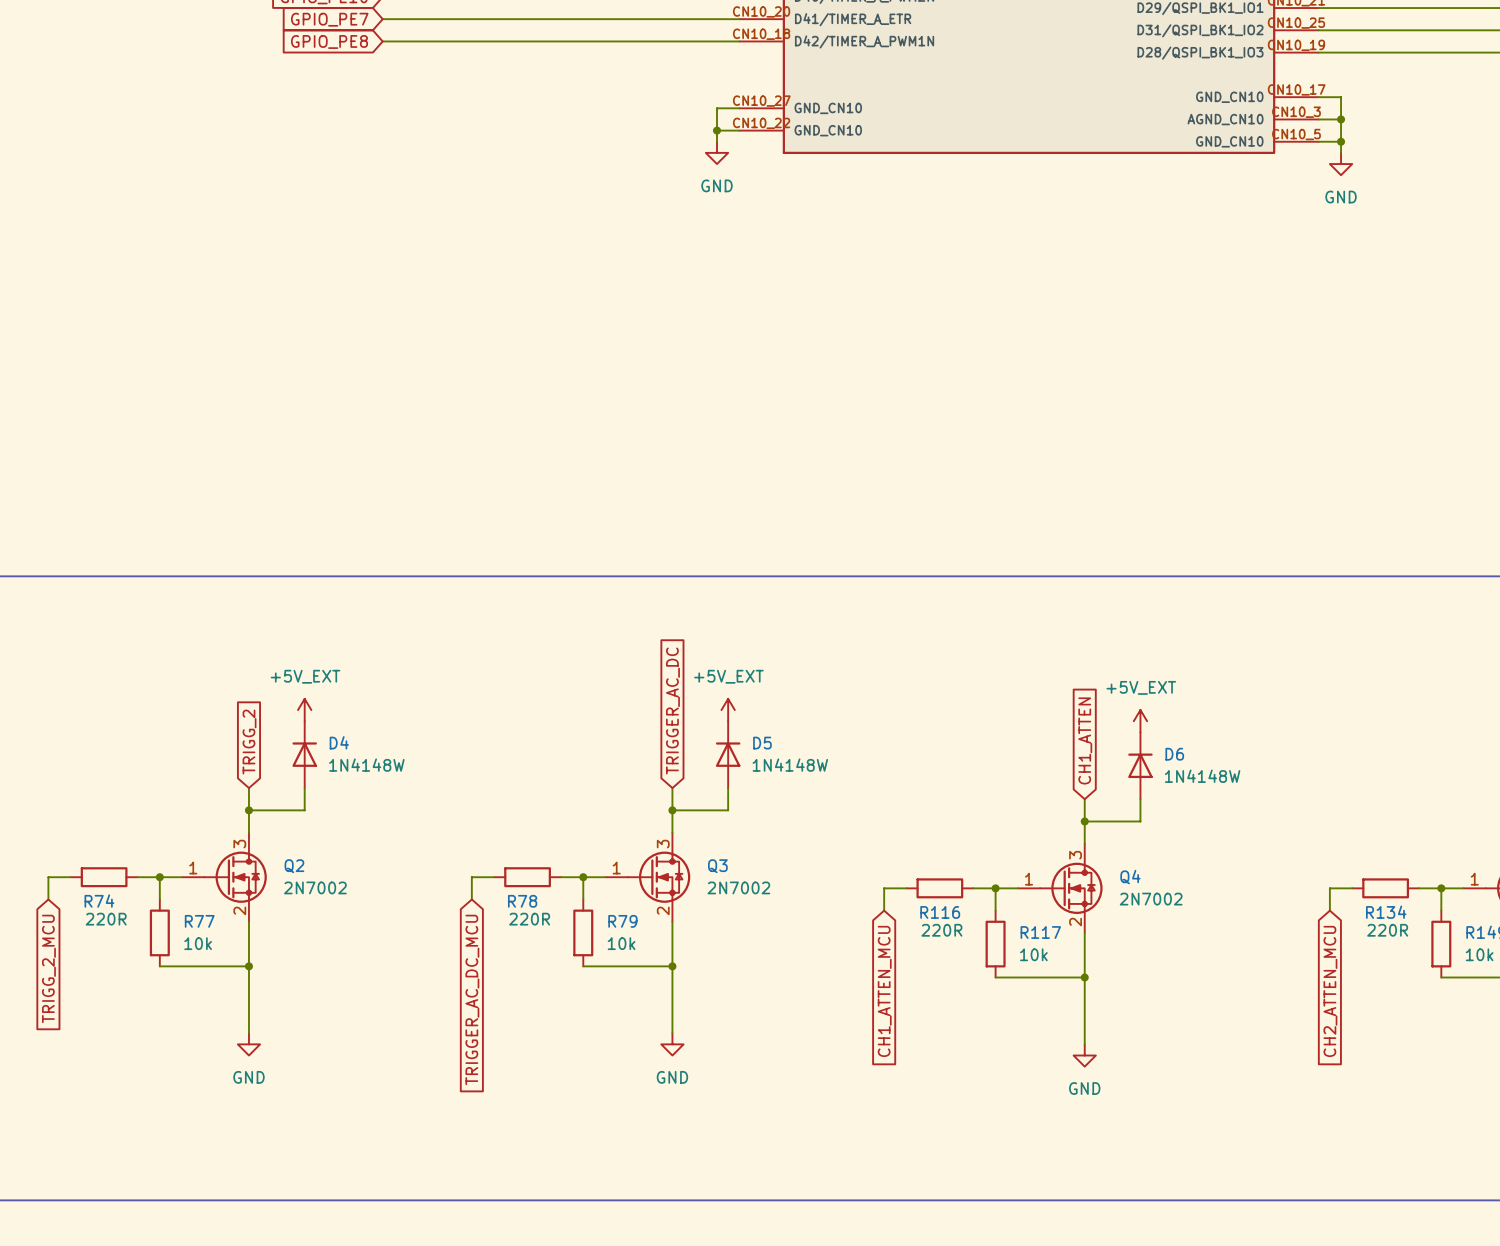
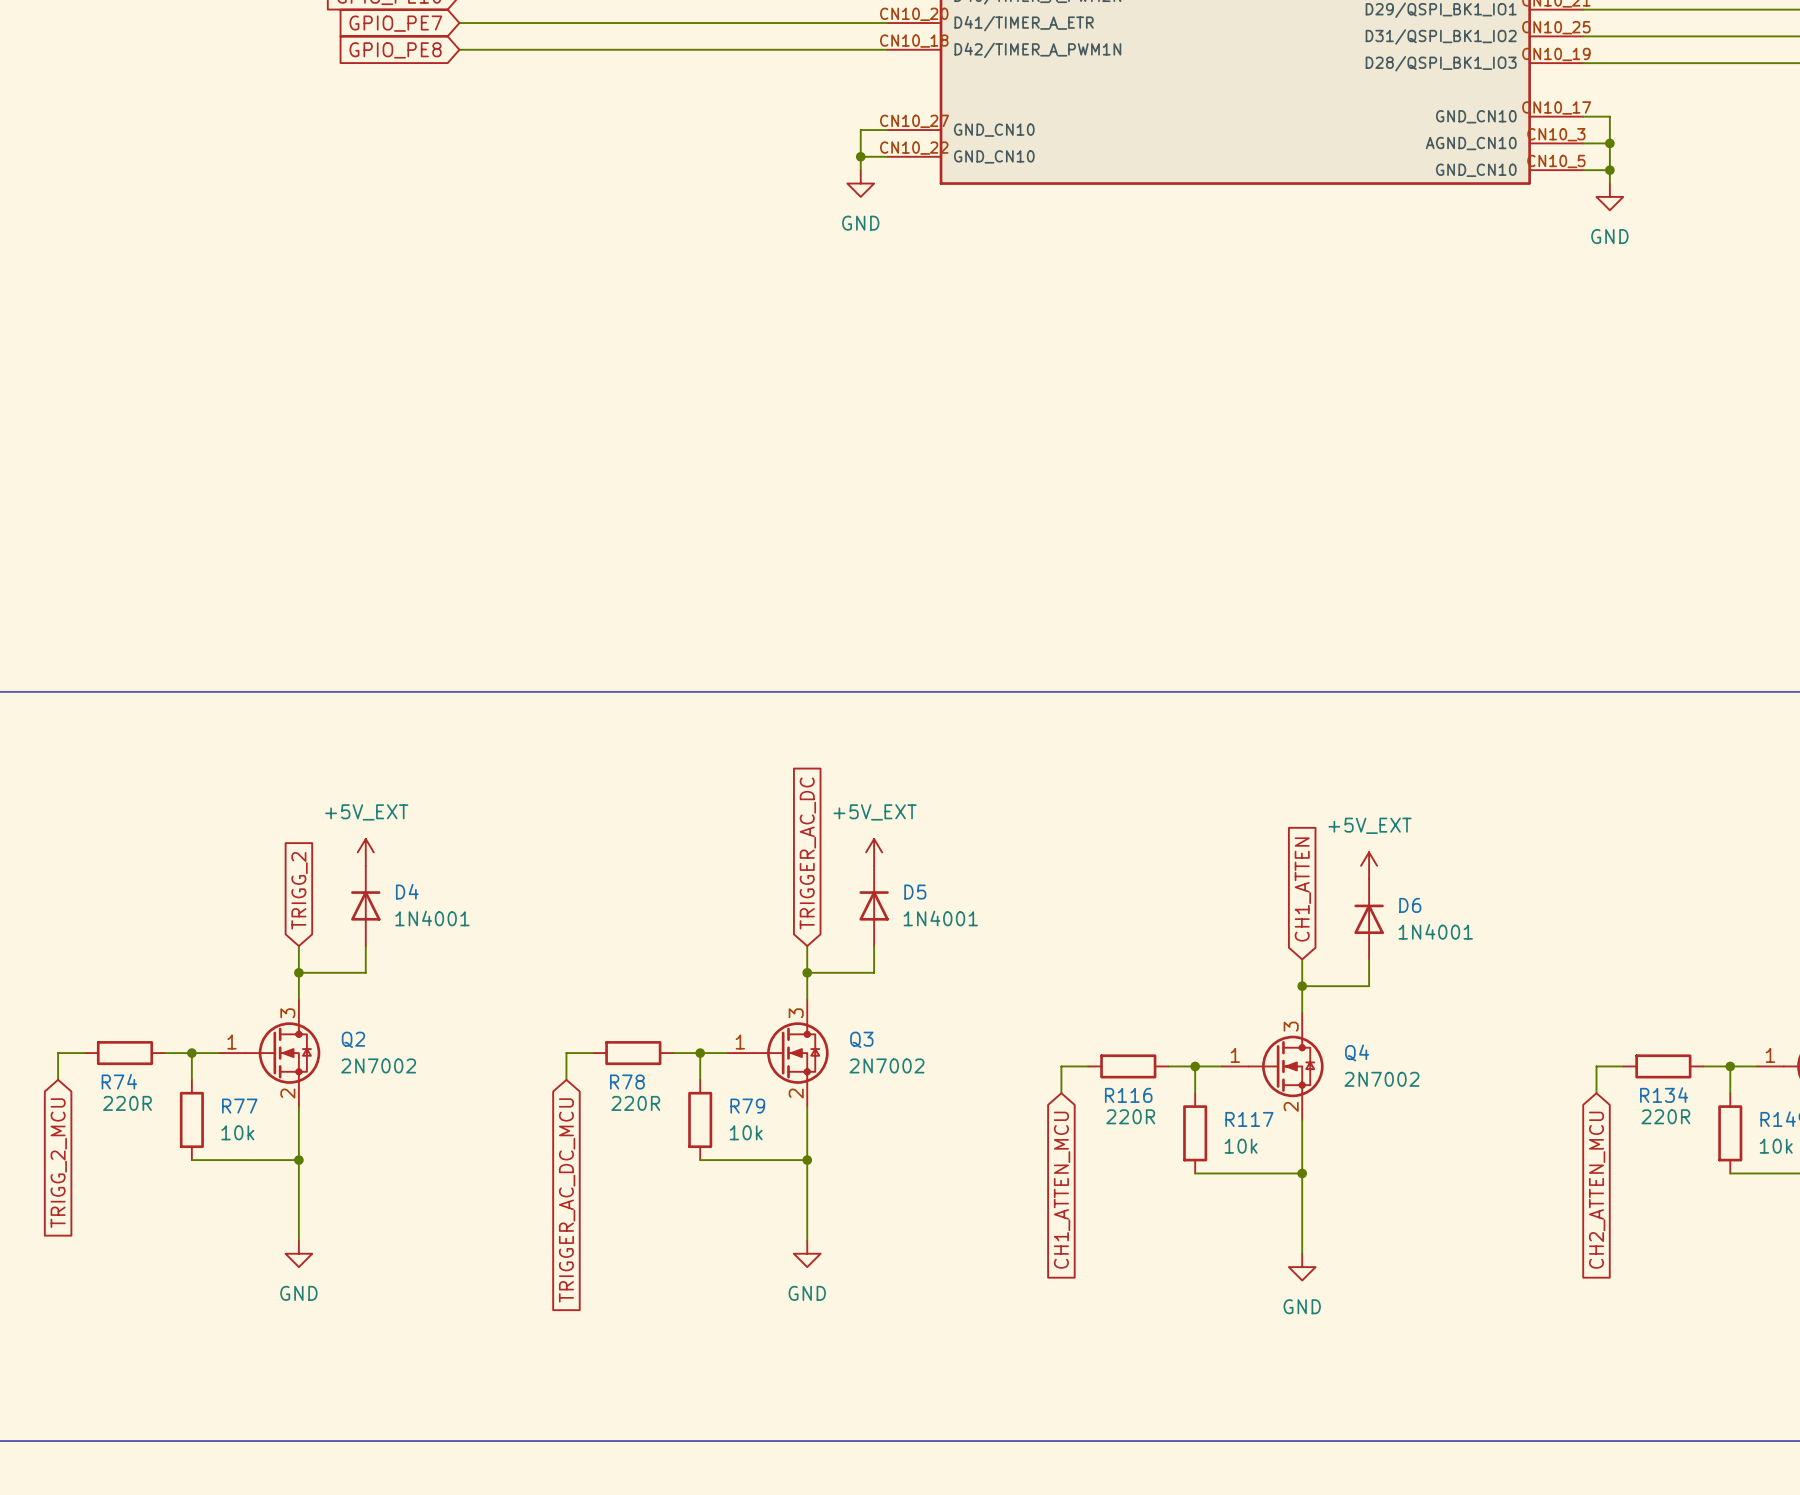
D4 value: 1N4148W (366, 765) -> 1N4001 (432, 918)
D5 value: 1N4148W (790, 765) -> 1N4001 (940, 918)
D6 value: 1N4148W (1202, 776) -> 1N4001 (1435, 931)

